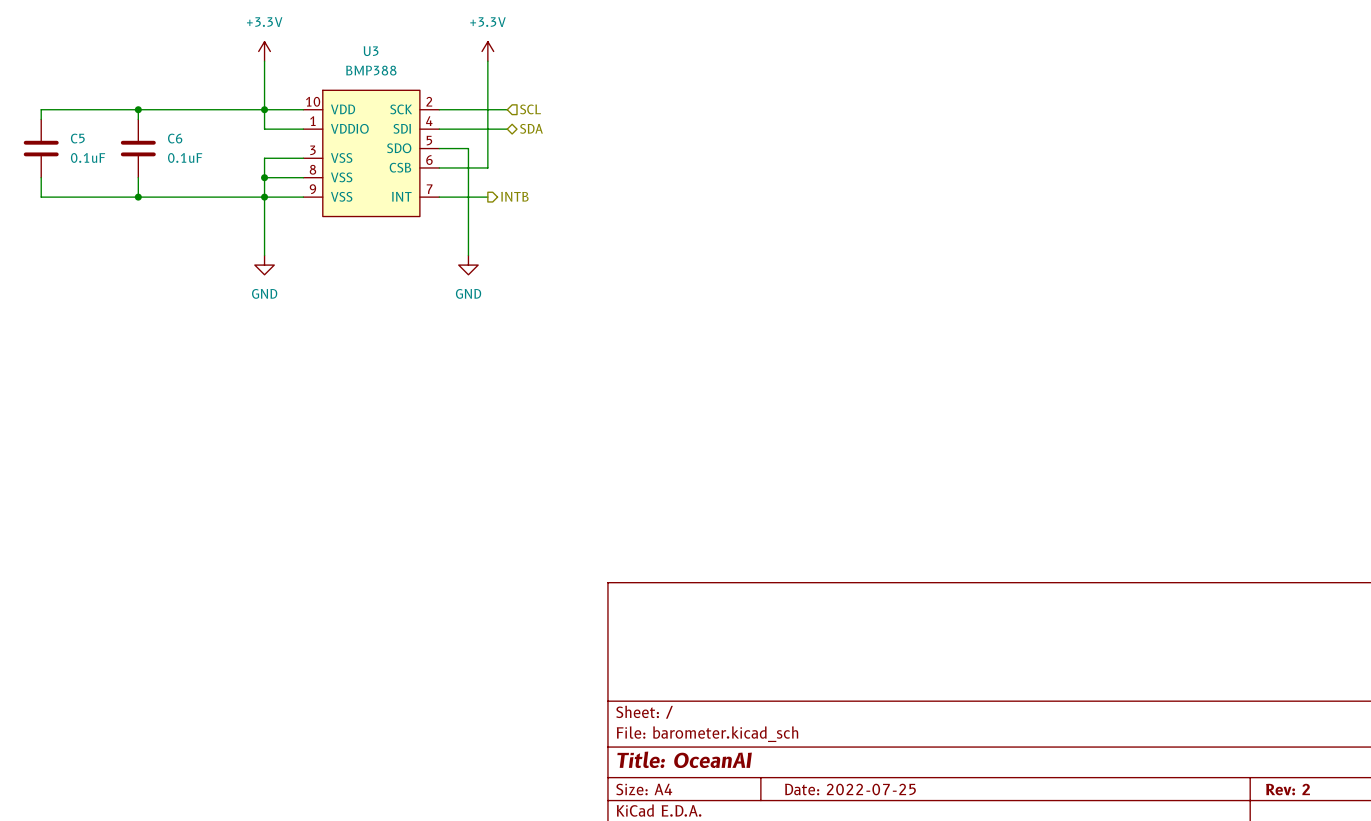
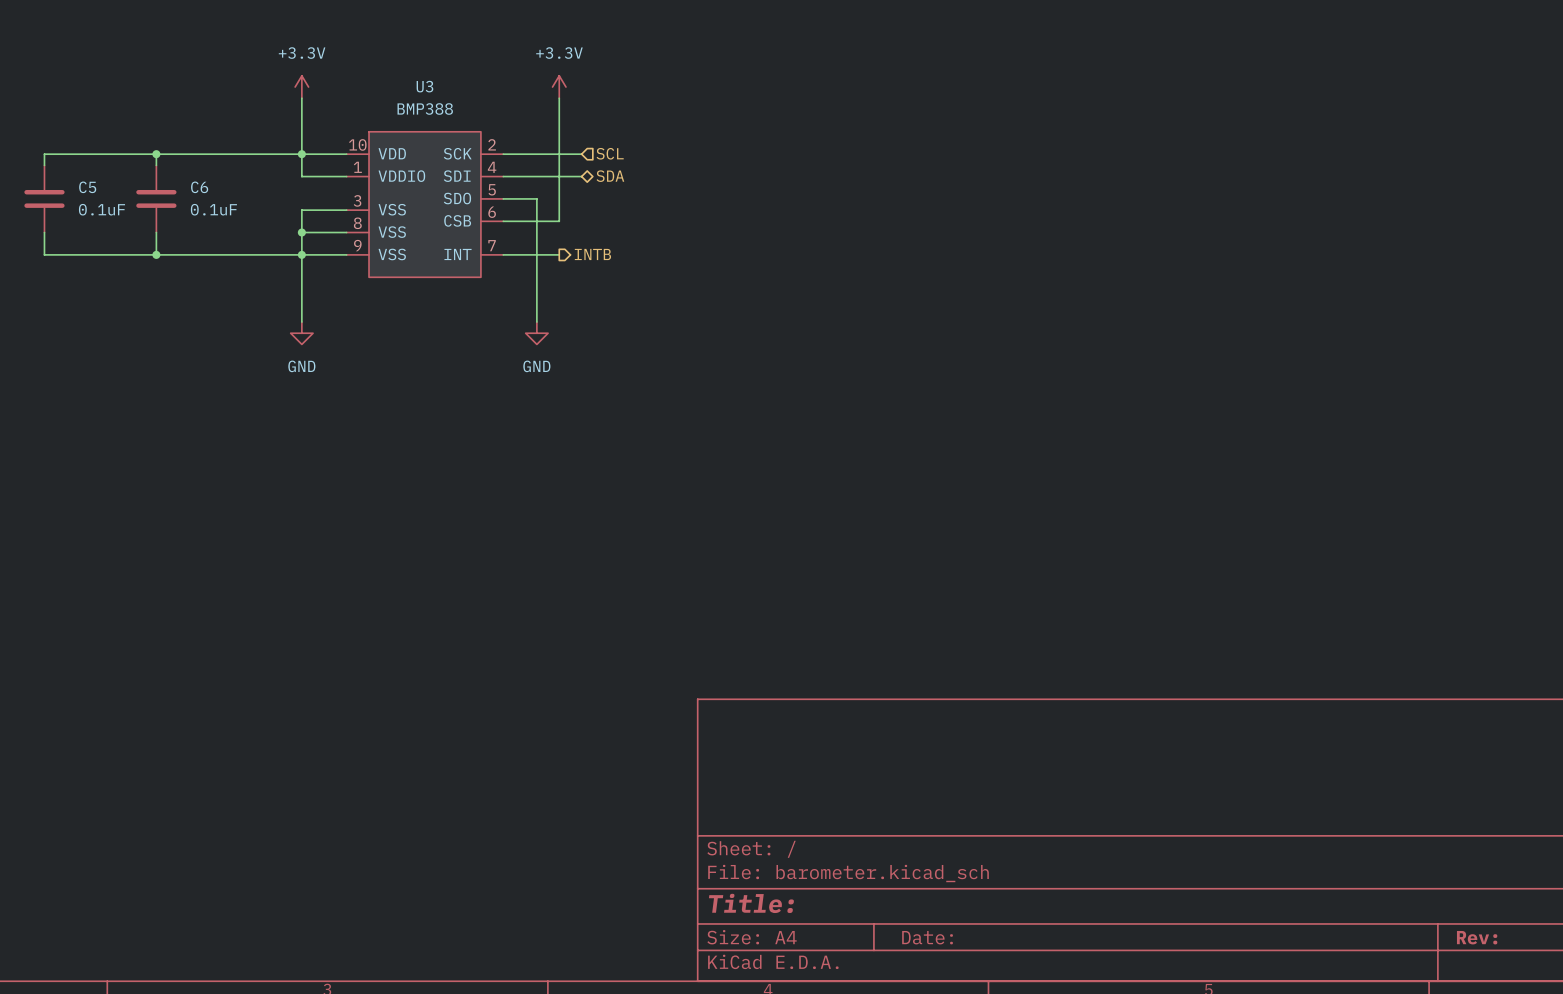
title block: Title: OceanAI (684, 759) -> Title: (751, 903)
title block: Date: 2022-07-25 (850, 789) -> Date: (927, 937)
title block: Rev: 2 (1288, 789) -> Rev: (1477, 937)

